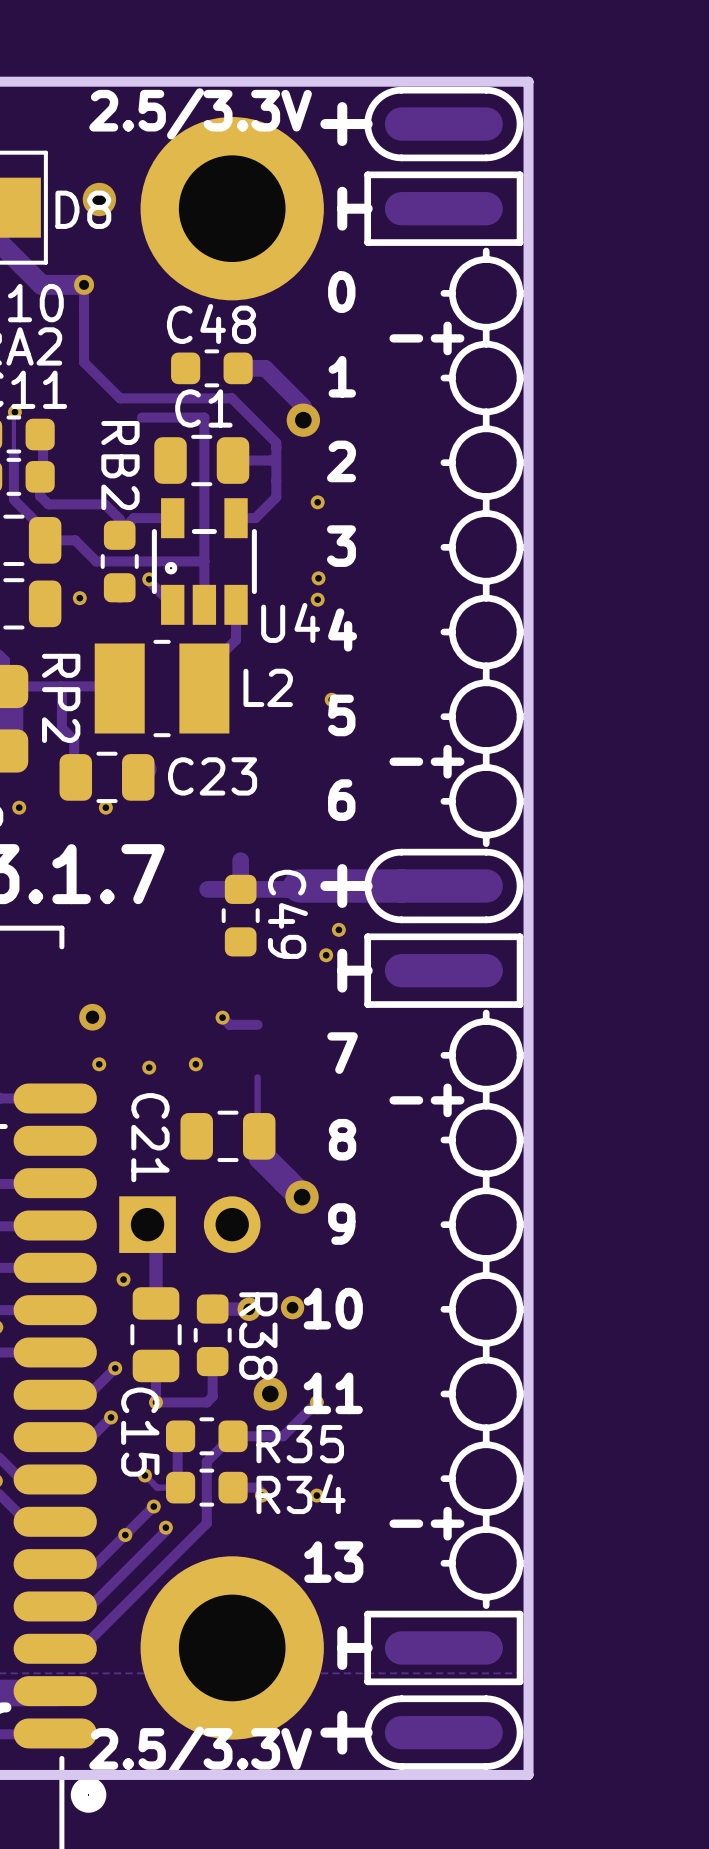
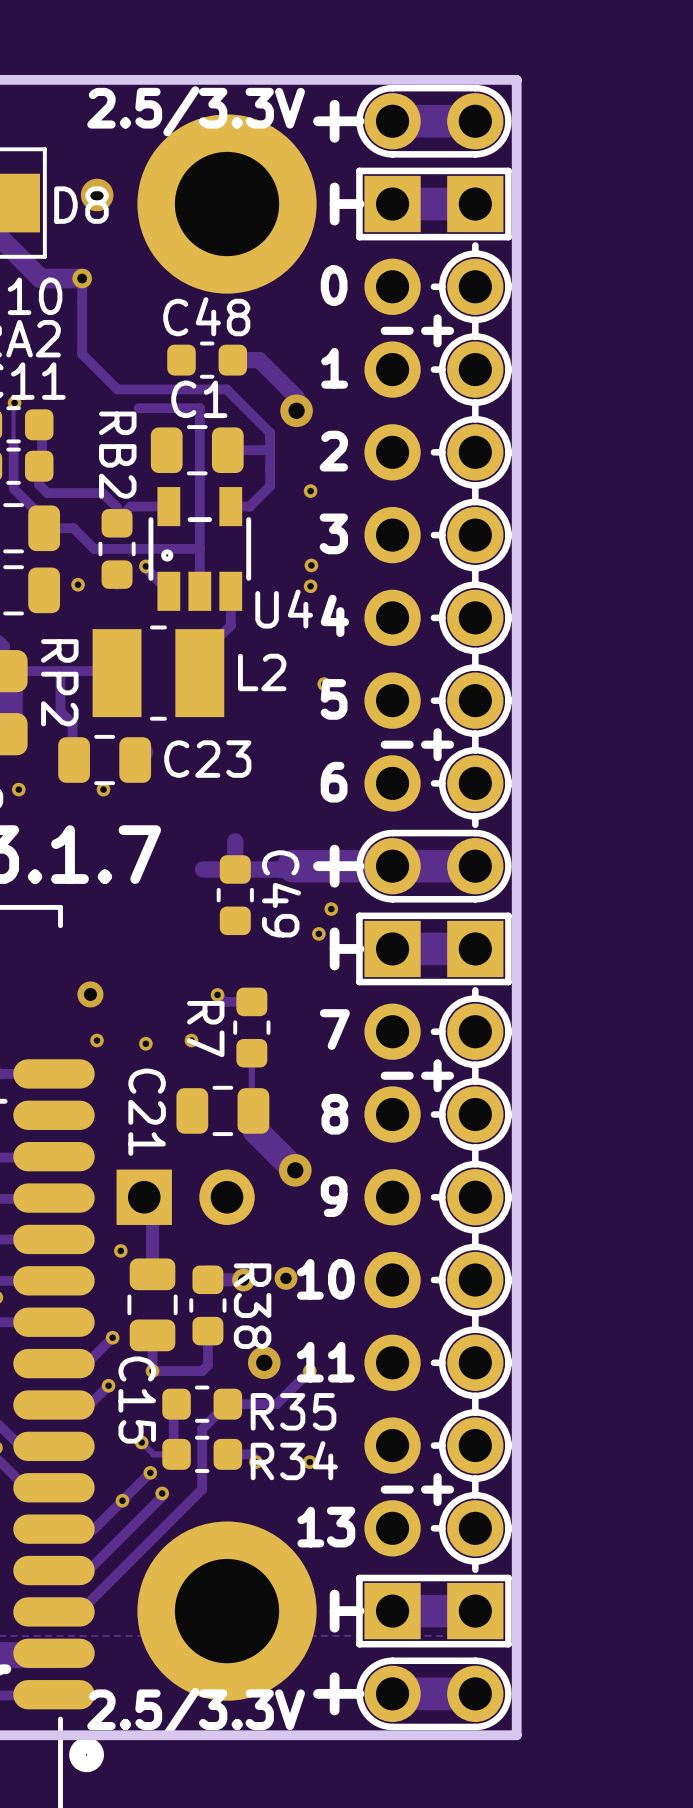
part: none -> (433, 907)
R7: none -> (251, 1027)

